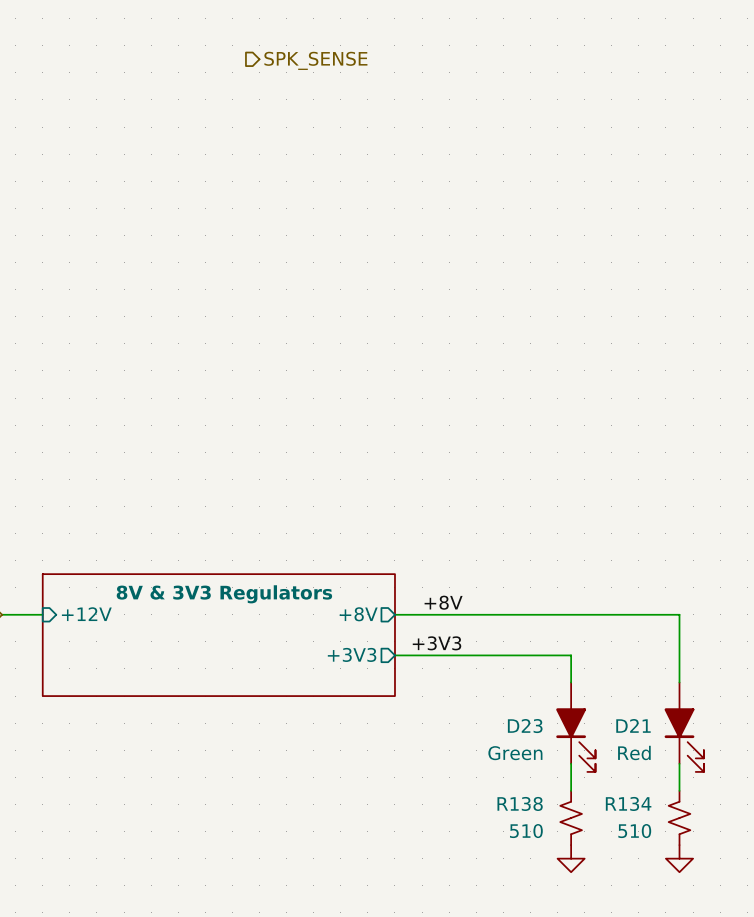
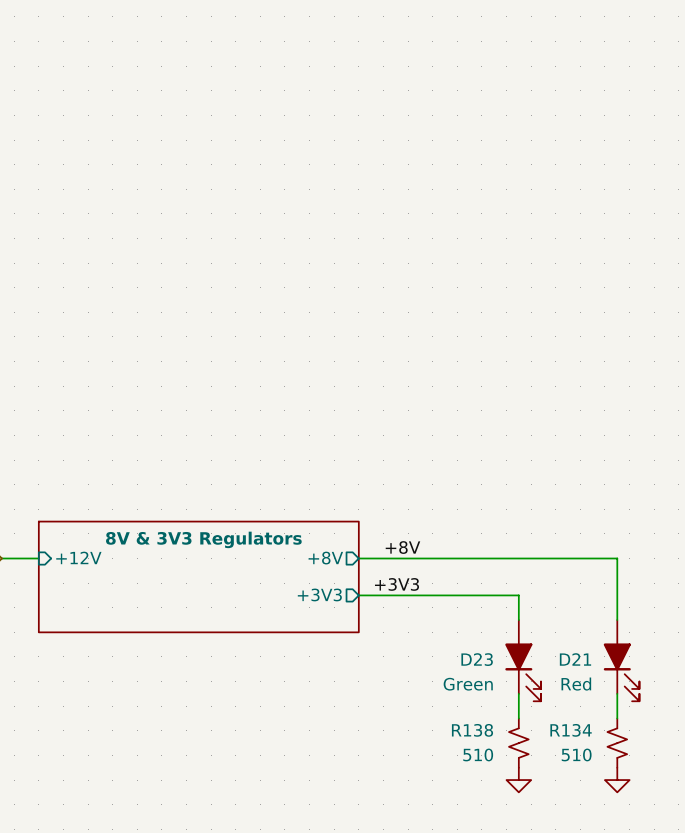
hierarchical label: SPK_SENSE (315, 60) -> none

